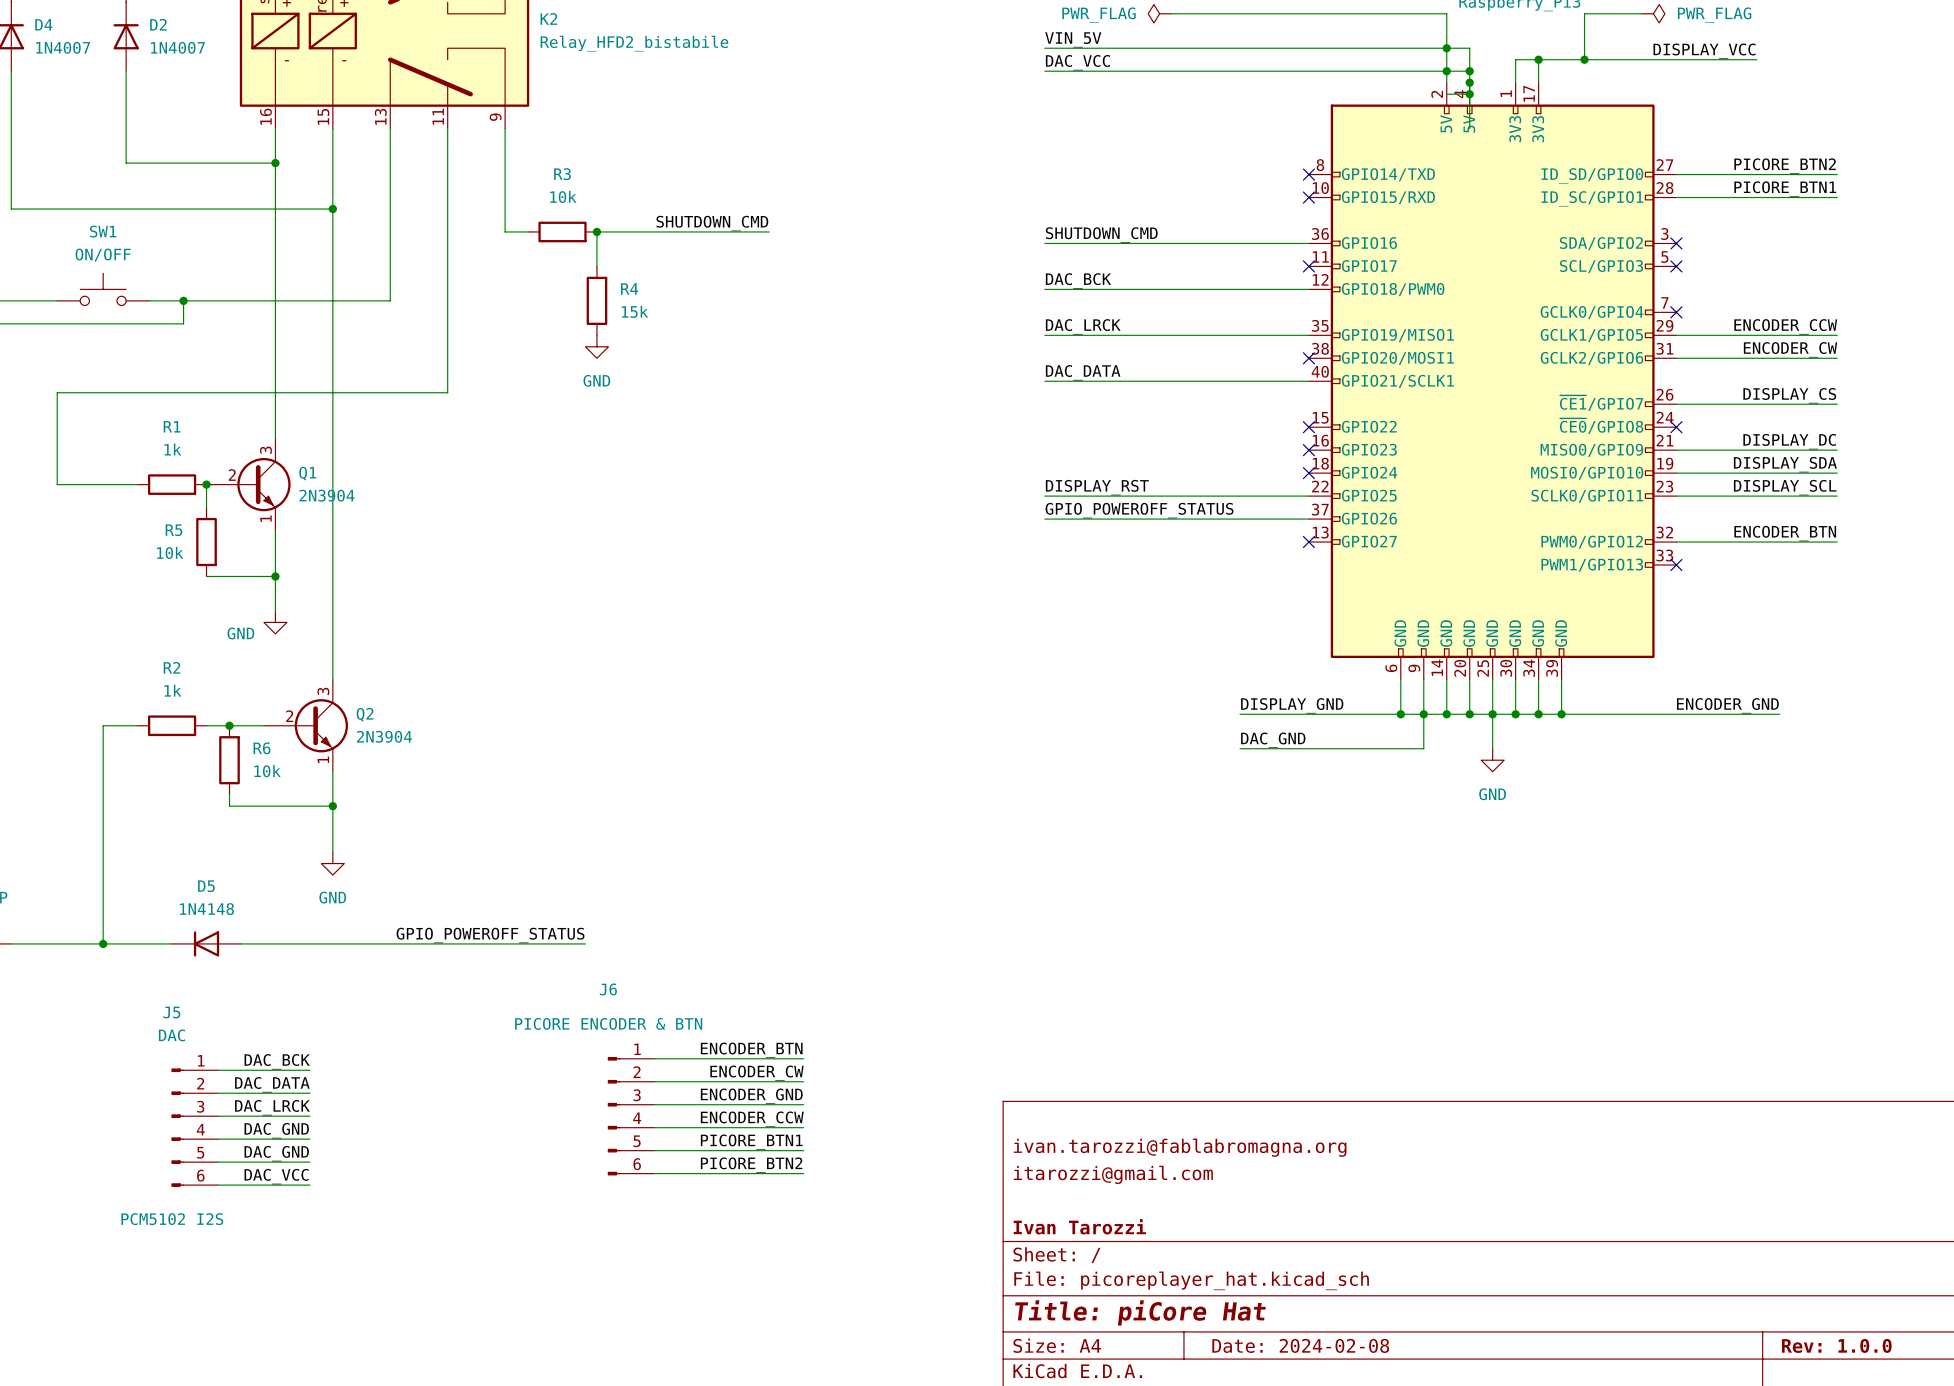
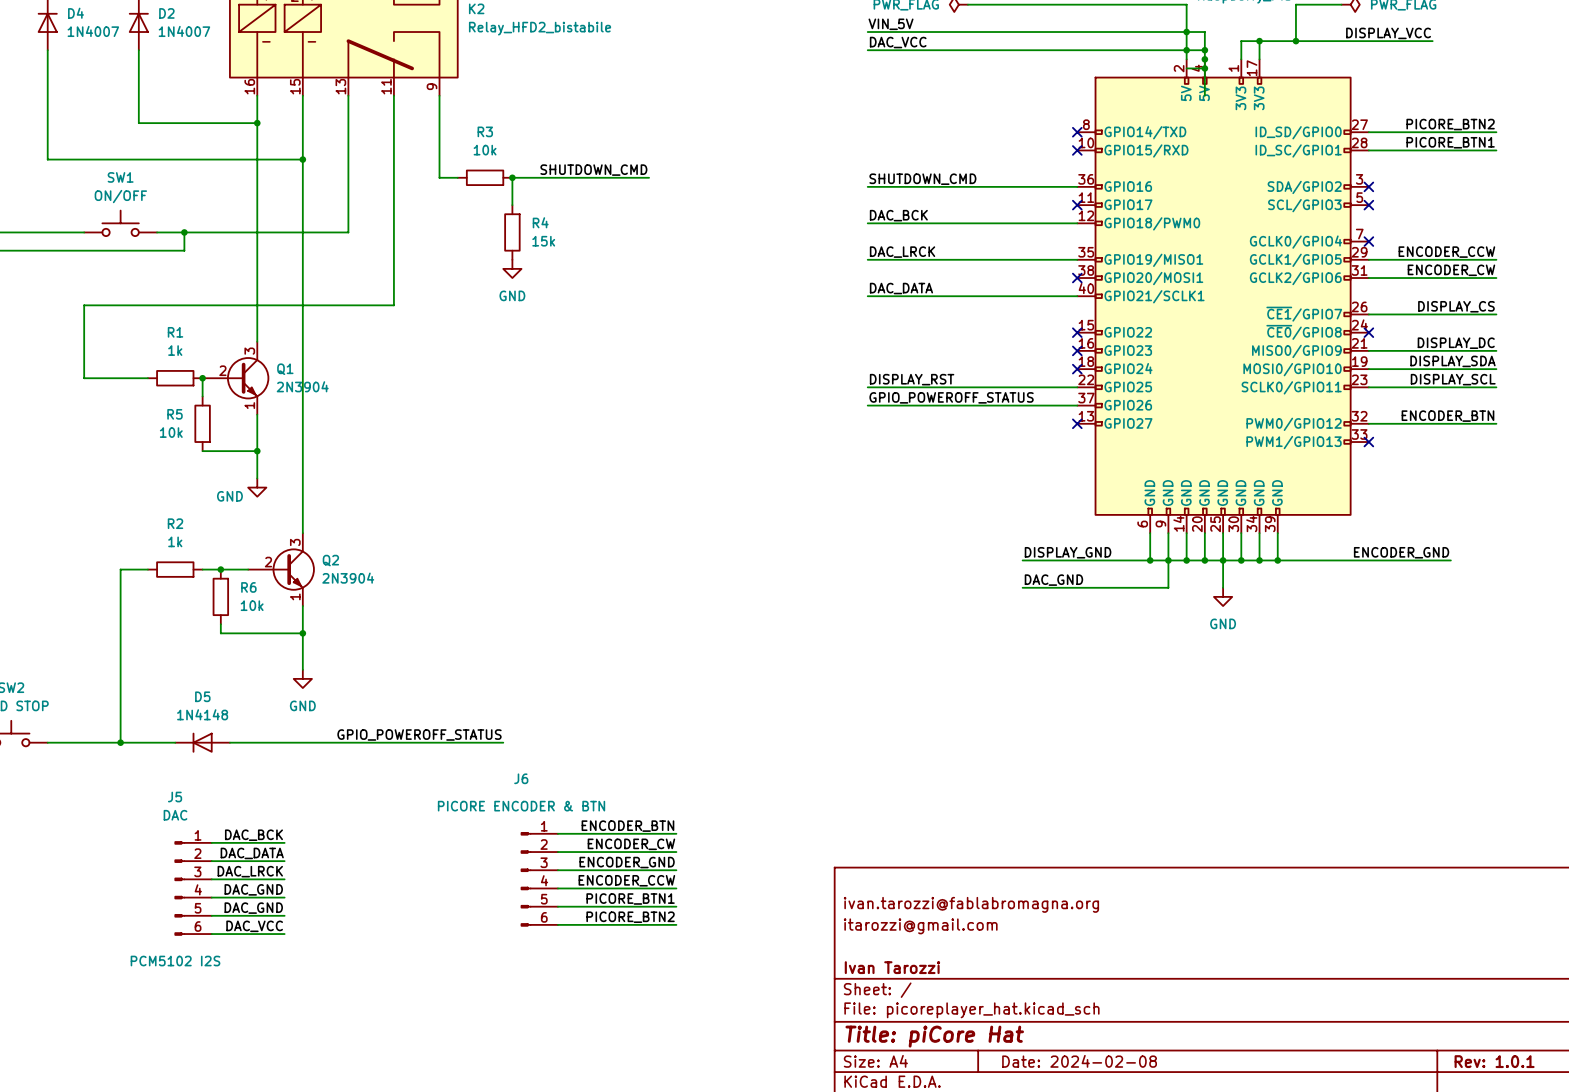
title block: Rev: 1.0.0 (1836, 1345) -> Rev: 1.0.1 (1494, 1061)

